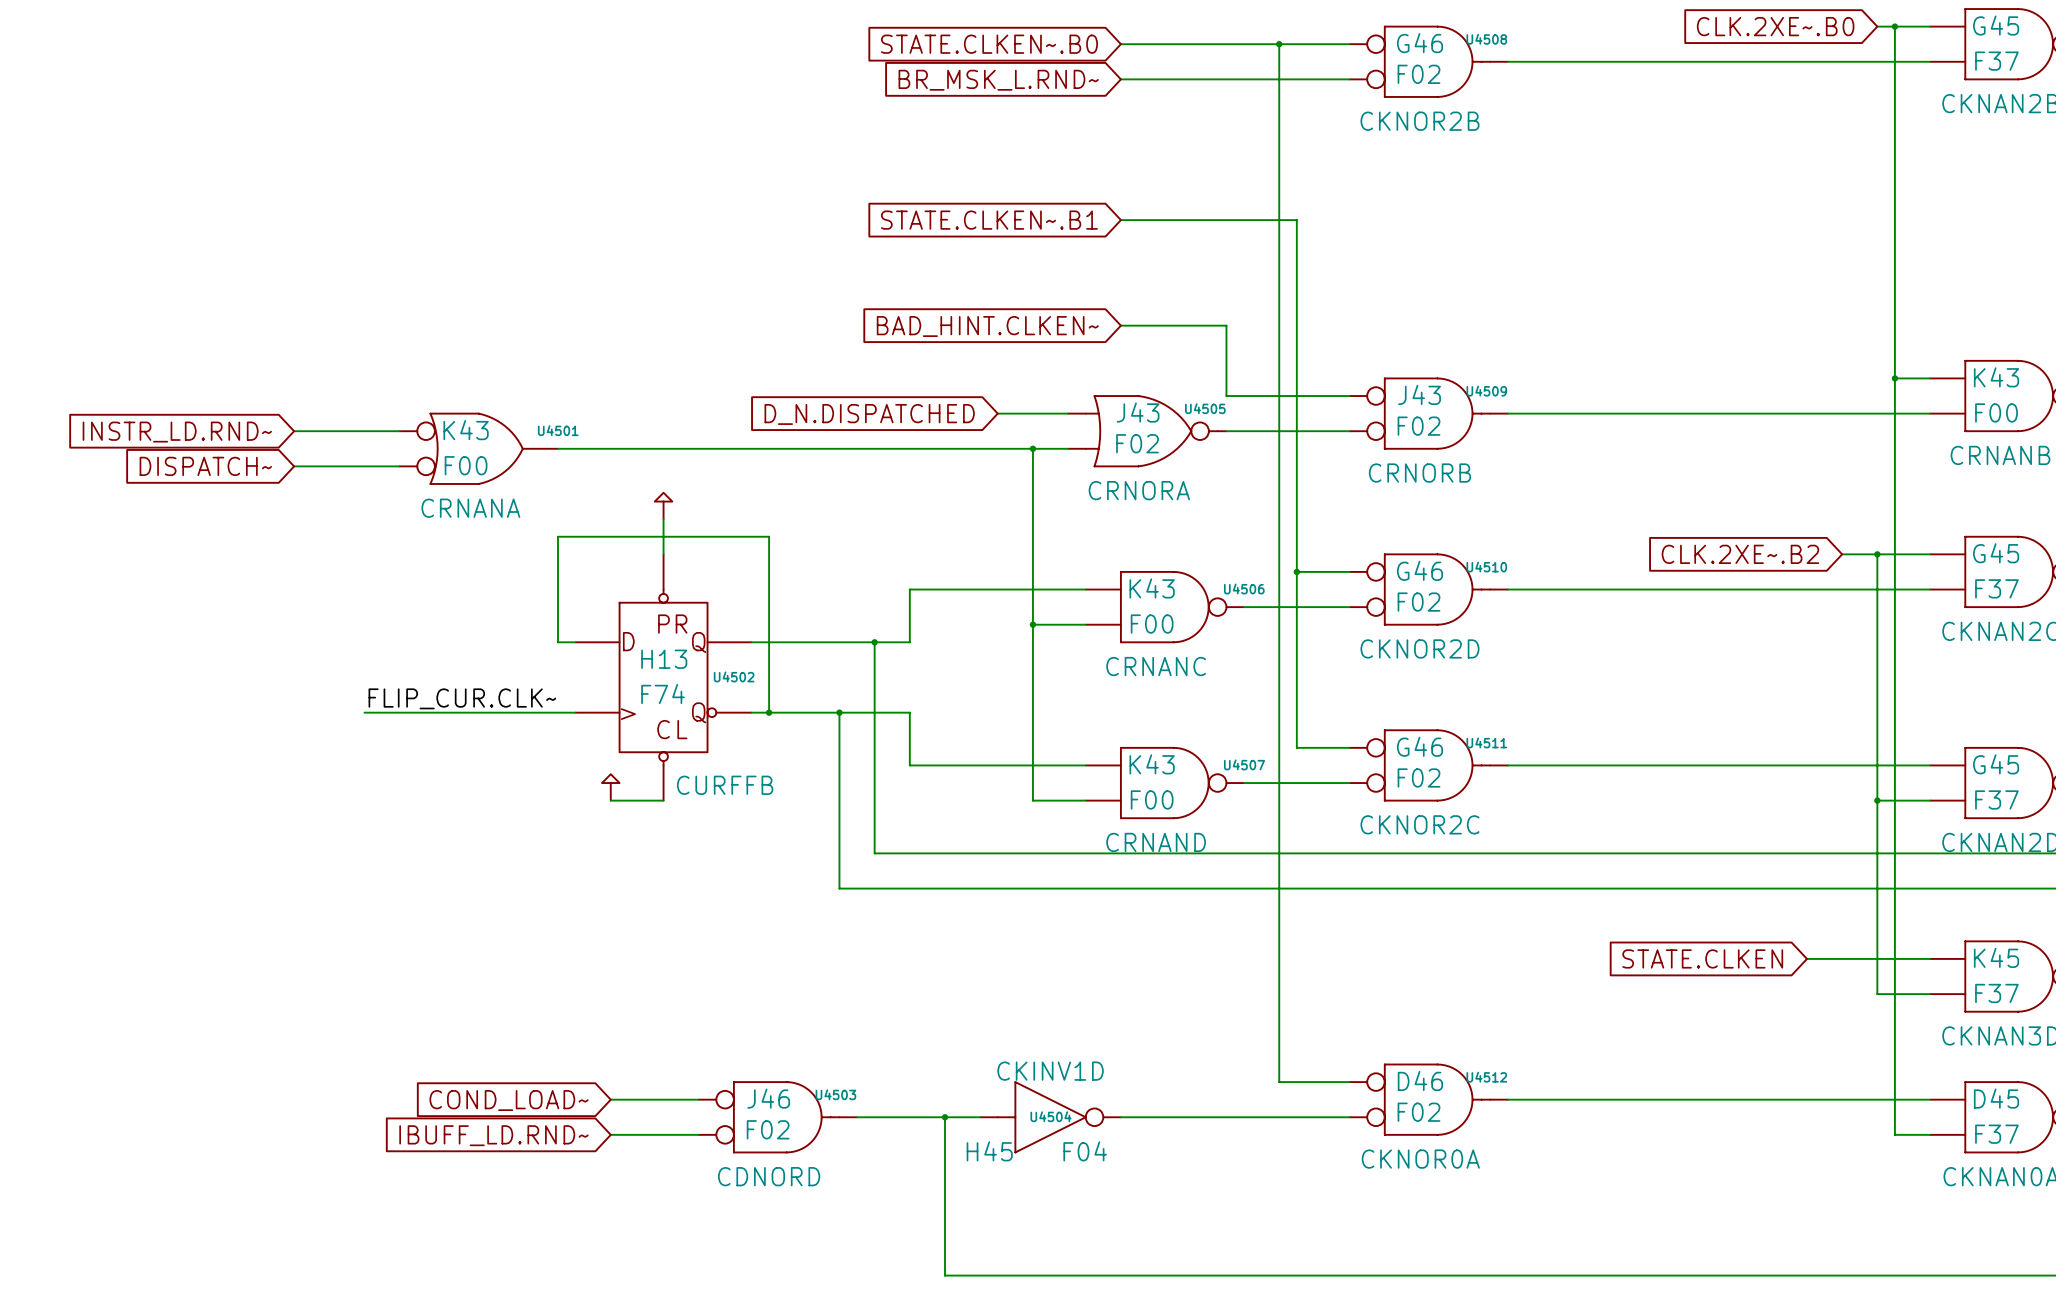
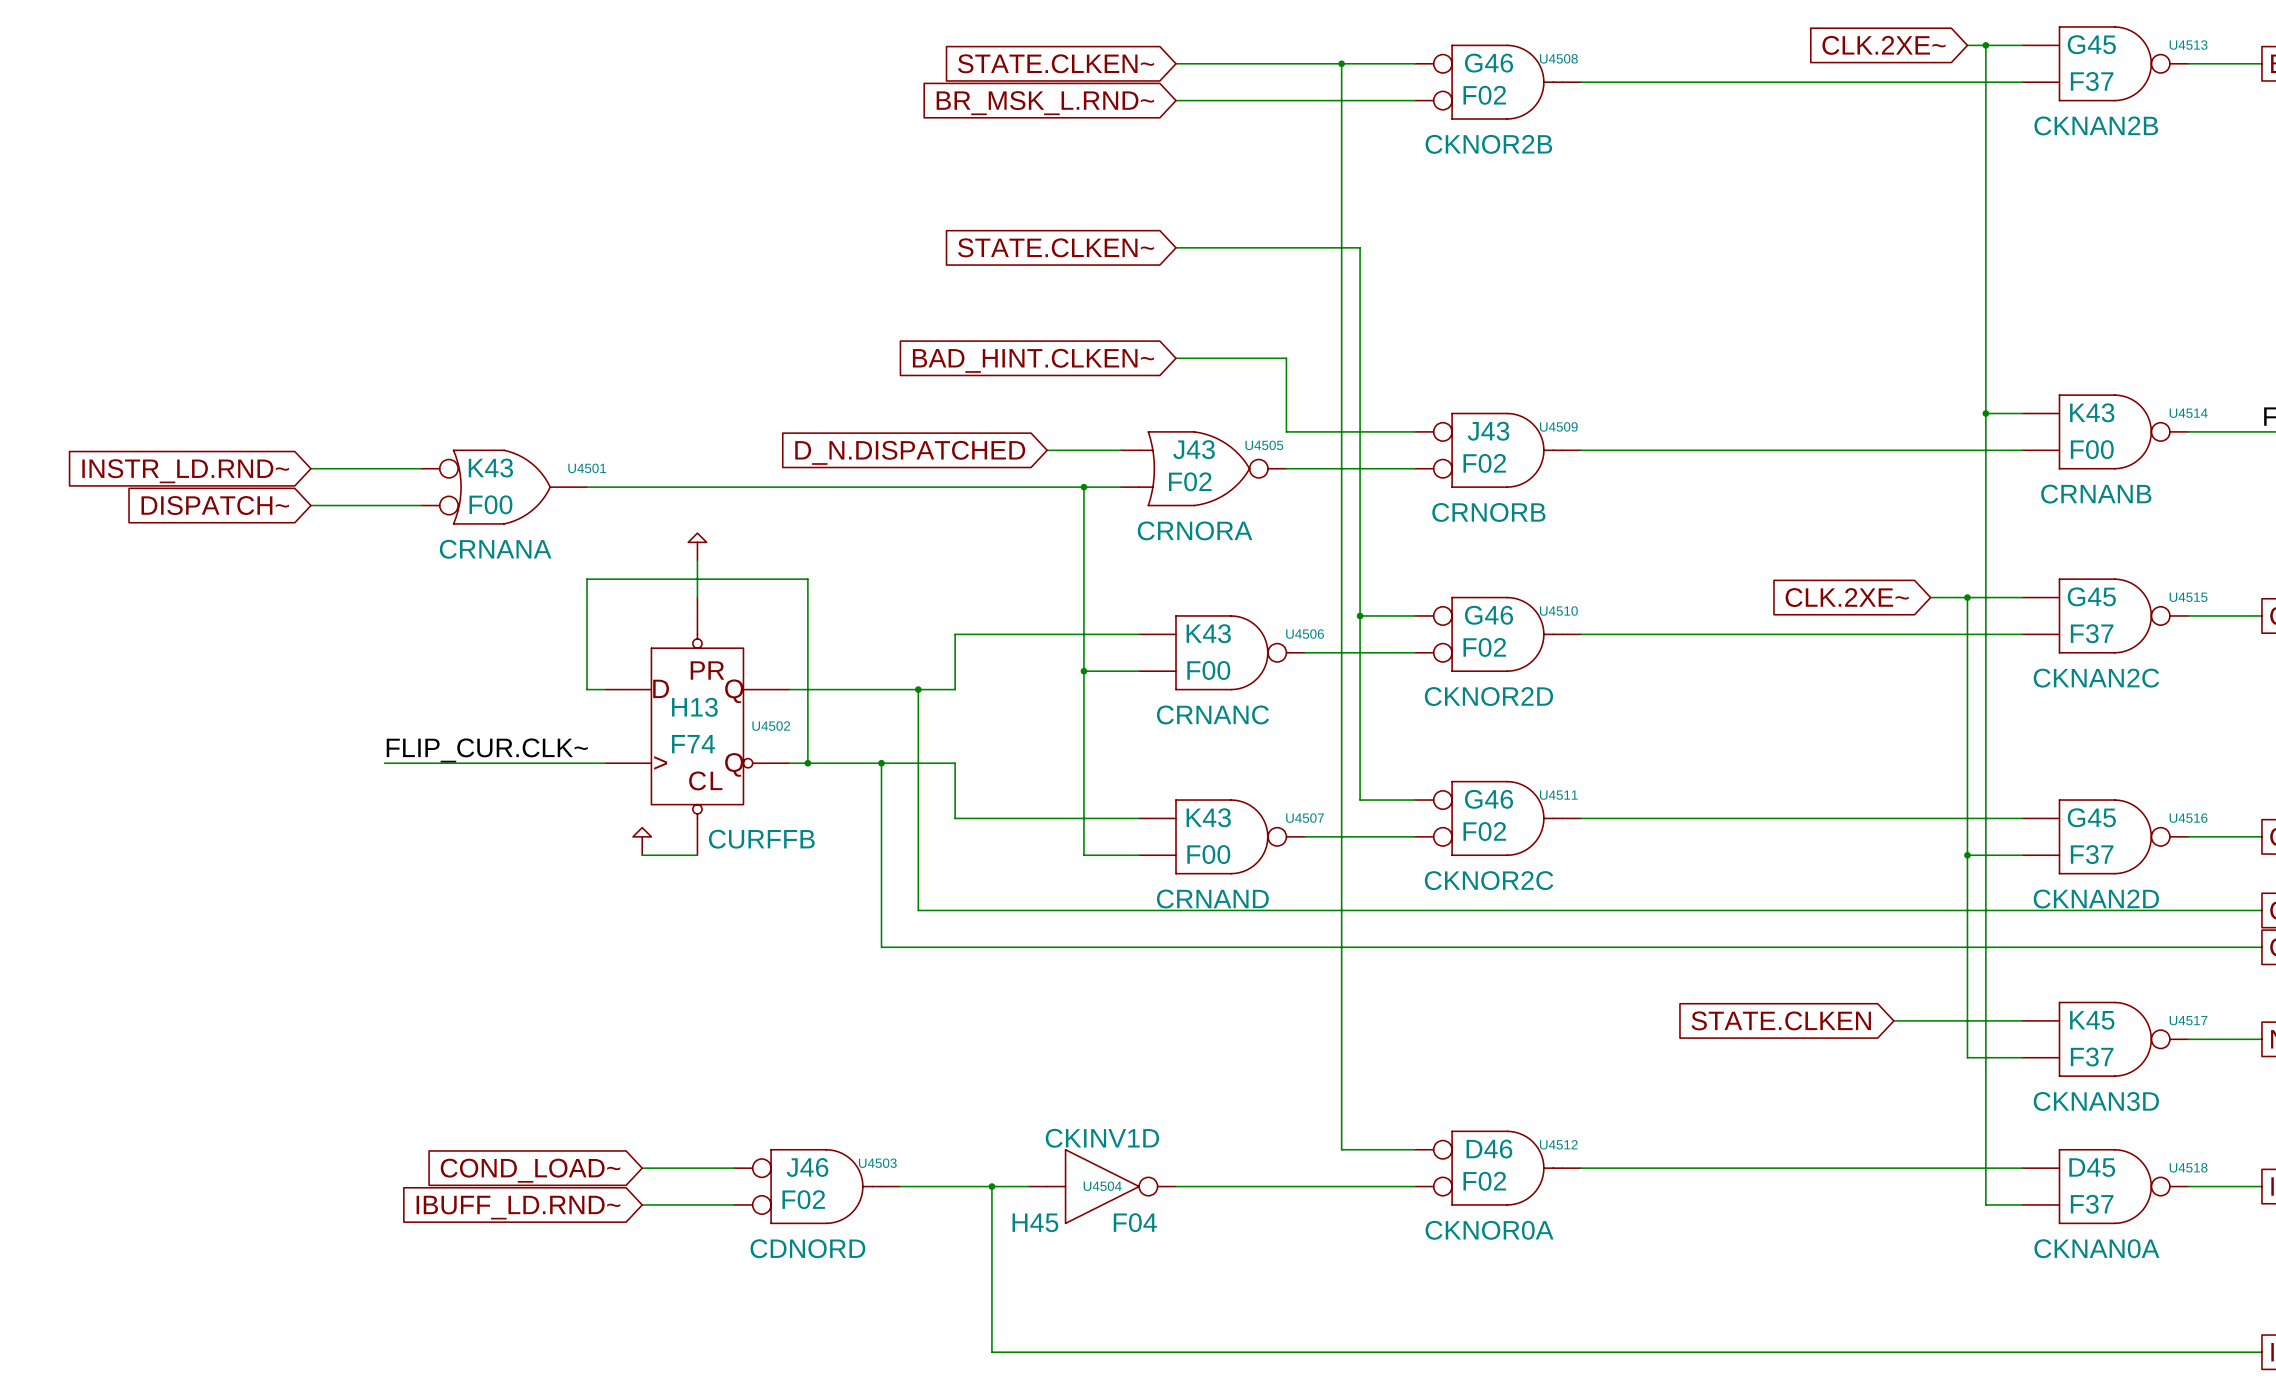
global label: CLK.2XE~.B0 (1775, 26) -> CLK.2XE~ (1883, 45)
global label: STATE.CLKEN~.B0 (989, 44) -> STATE.CLKEN~ (1056, 63)
global label: STATE.CLKEN~.B1 (989, 220) -> STATE.CLKEN~ (1056, 247)
global label: CLK.2XE~.B2 (1740, 554) -> CLK.2XE~ (1847, 597)

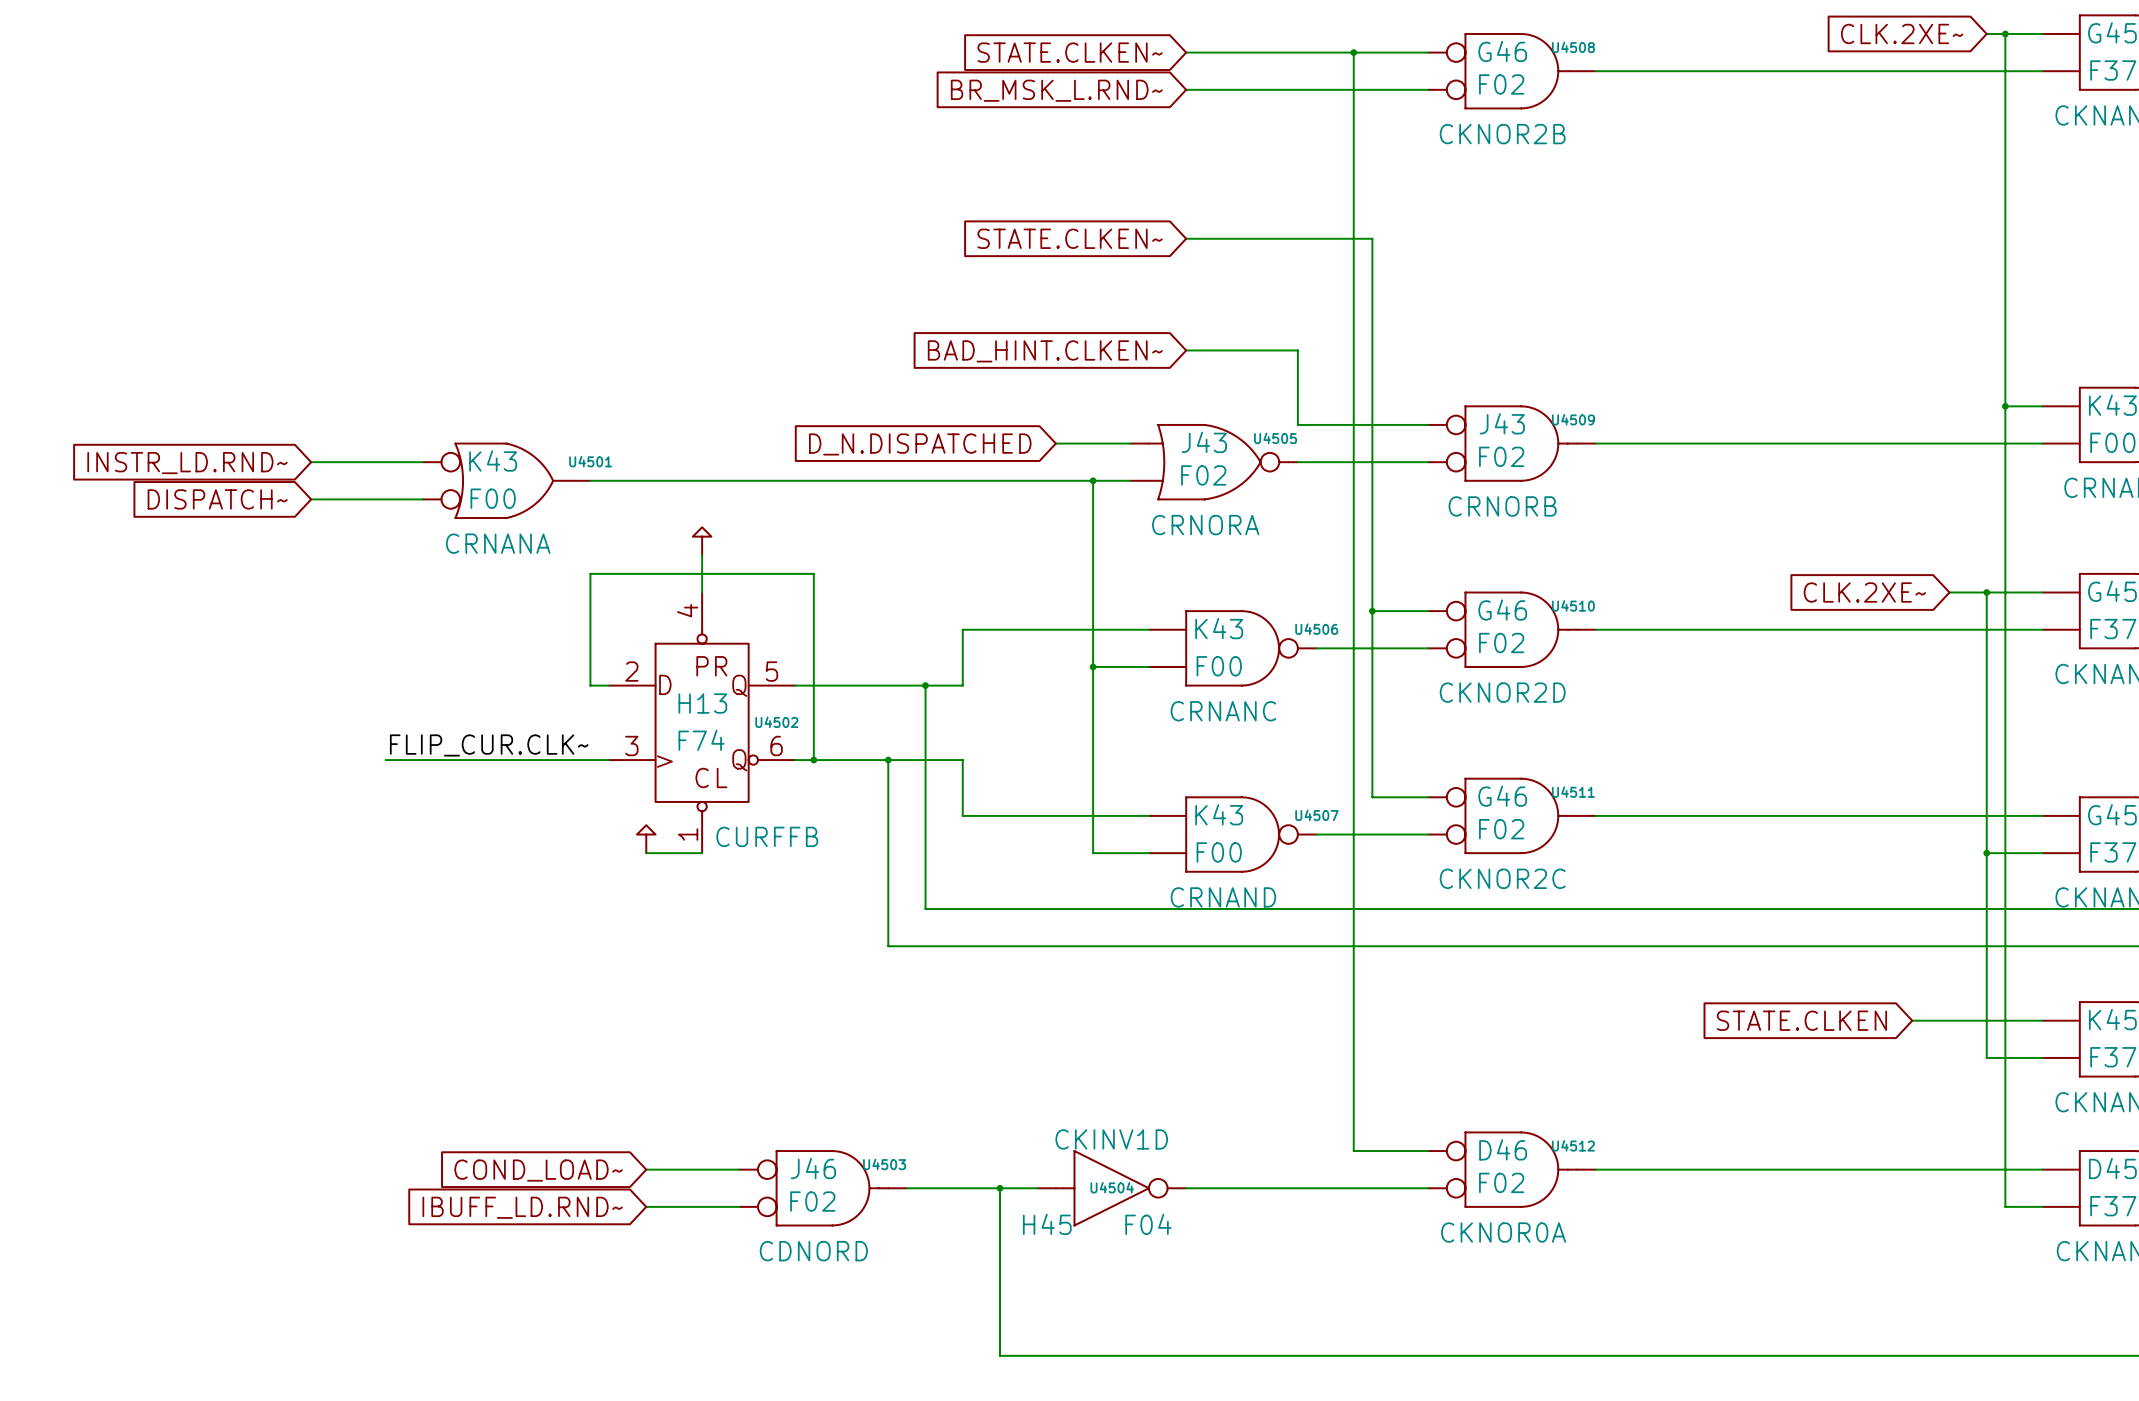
U4502 pin number: none -> 4 (687, 610)
U4502 pin number: none -> 2 (631, 671)
U4502 pin number: none -> 5 (771, 671)
U4502 pin number: none -> 3 (631, 746)
U4502 pin number: none -> 6 (776, 746)
U4502 pin number: none -> 1 (688, 834)

